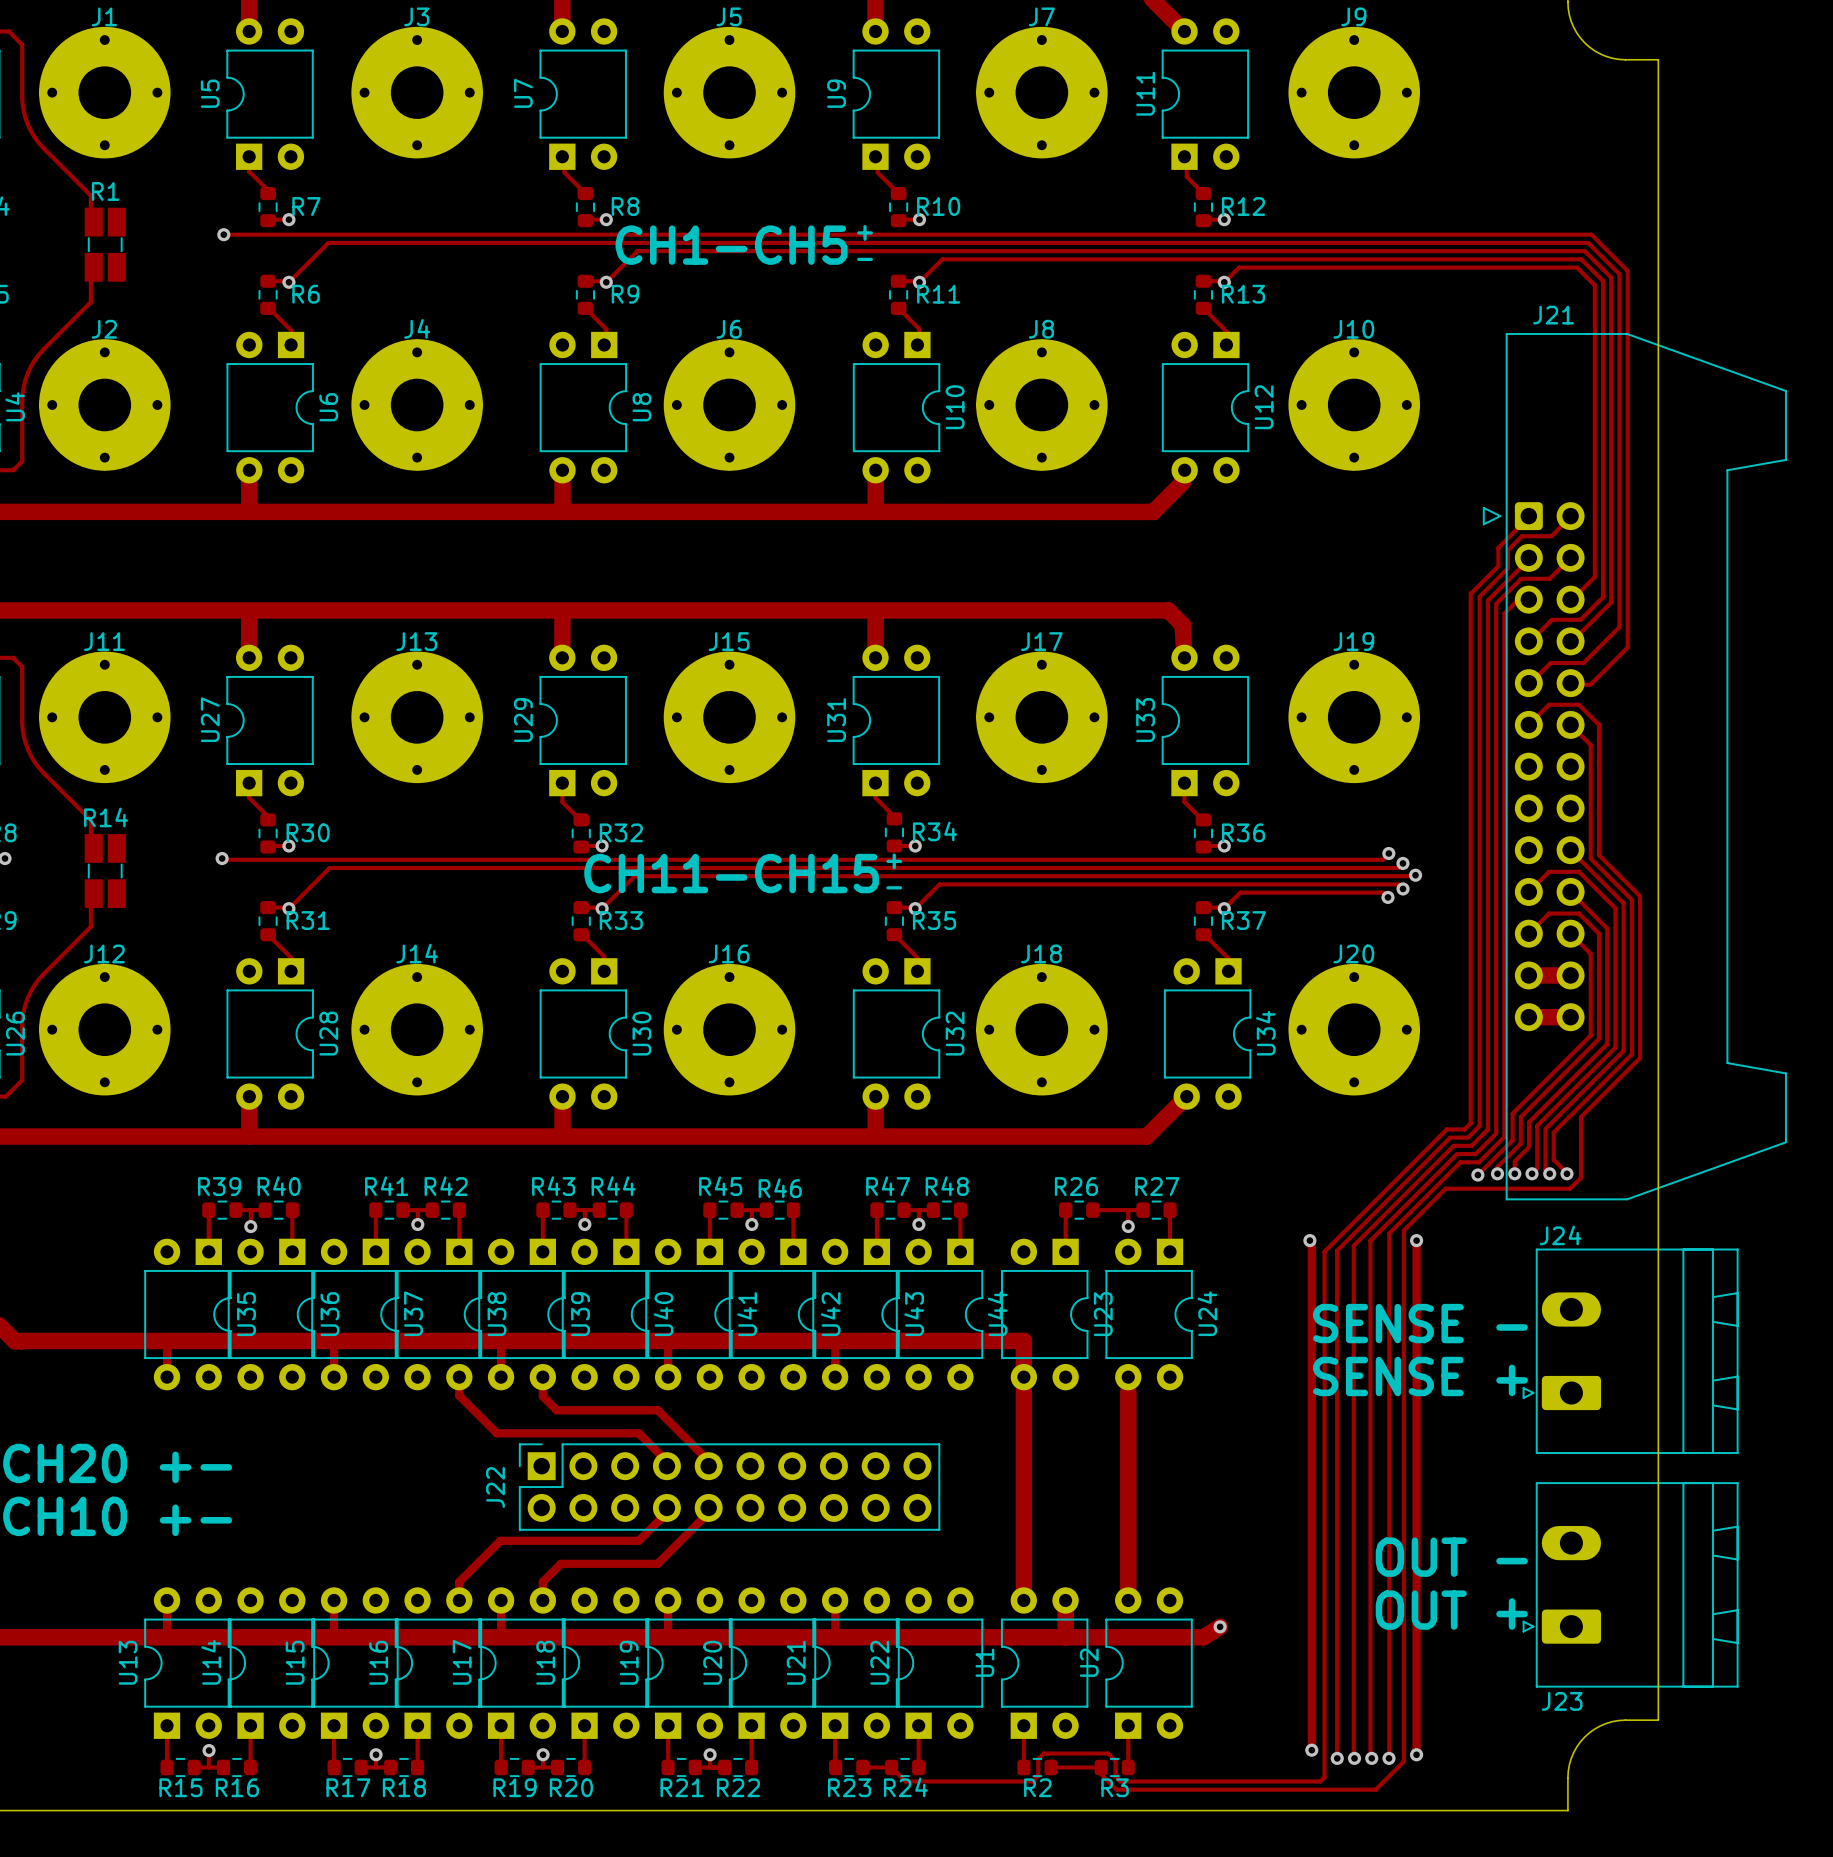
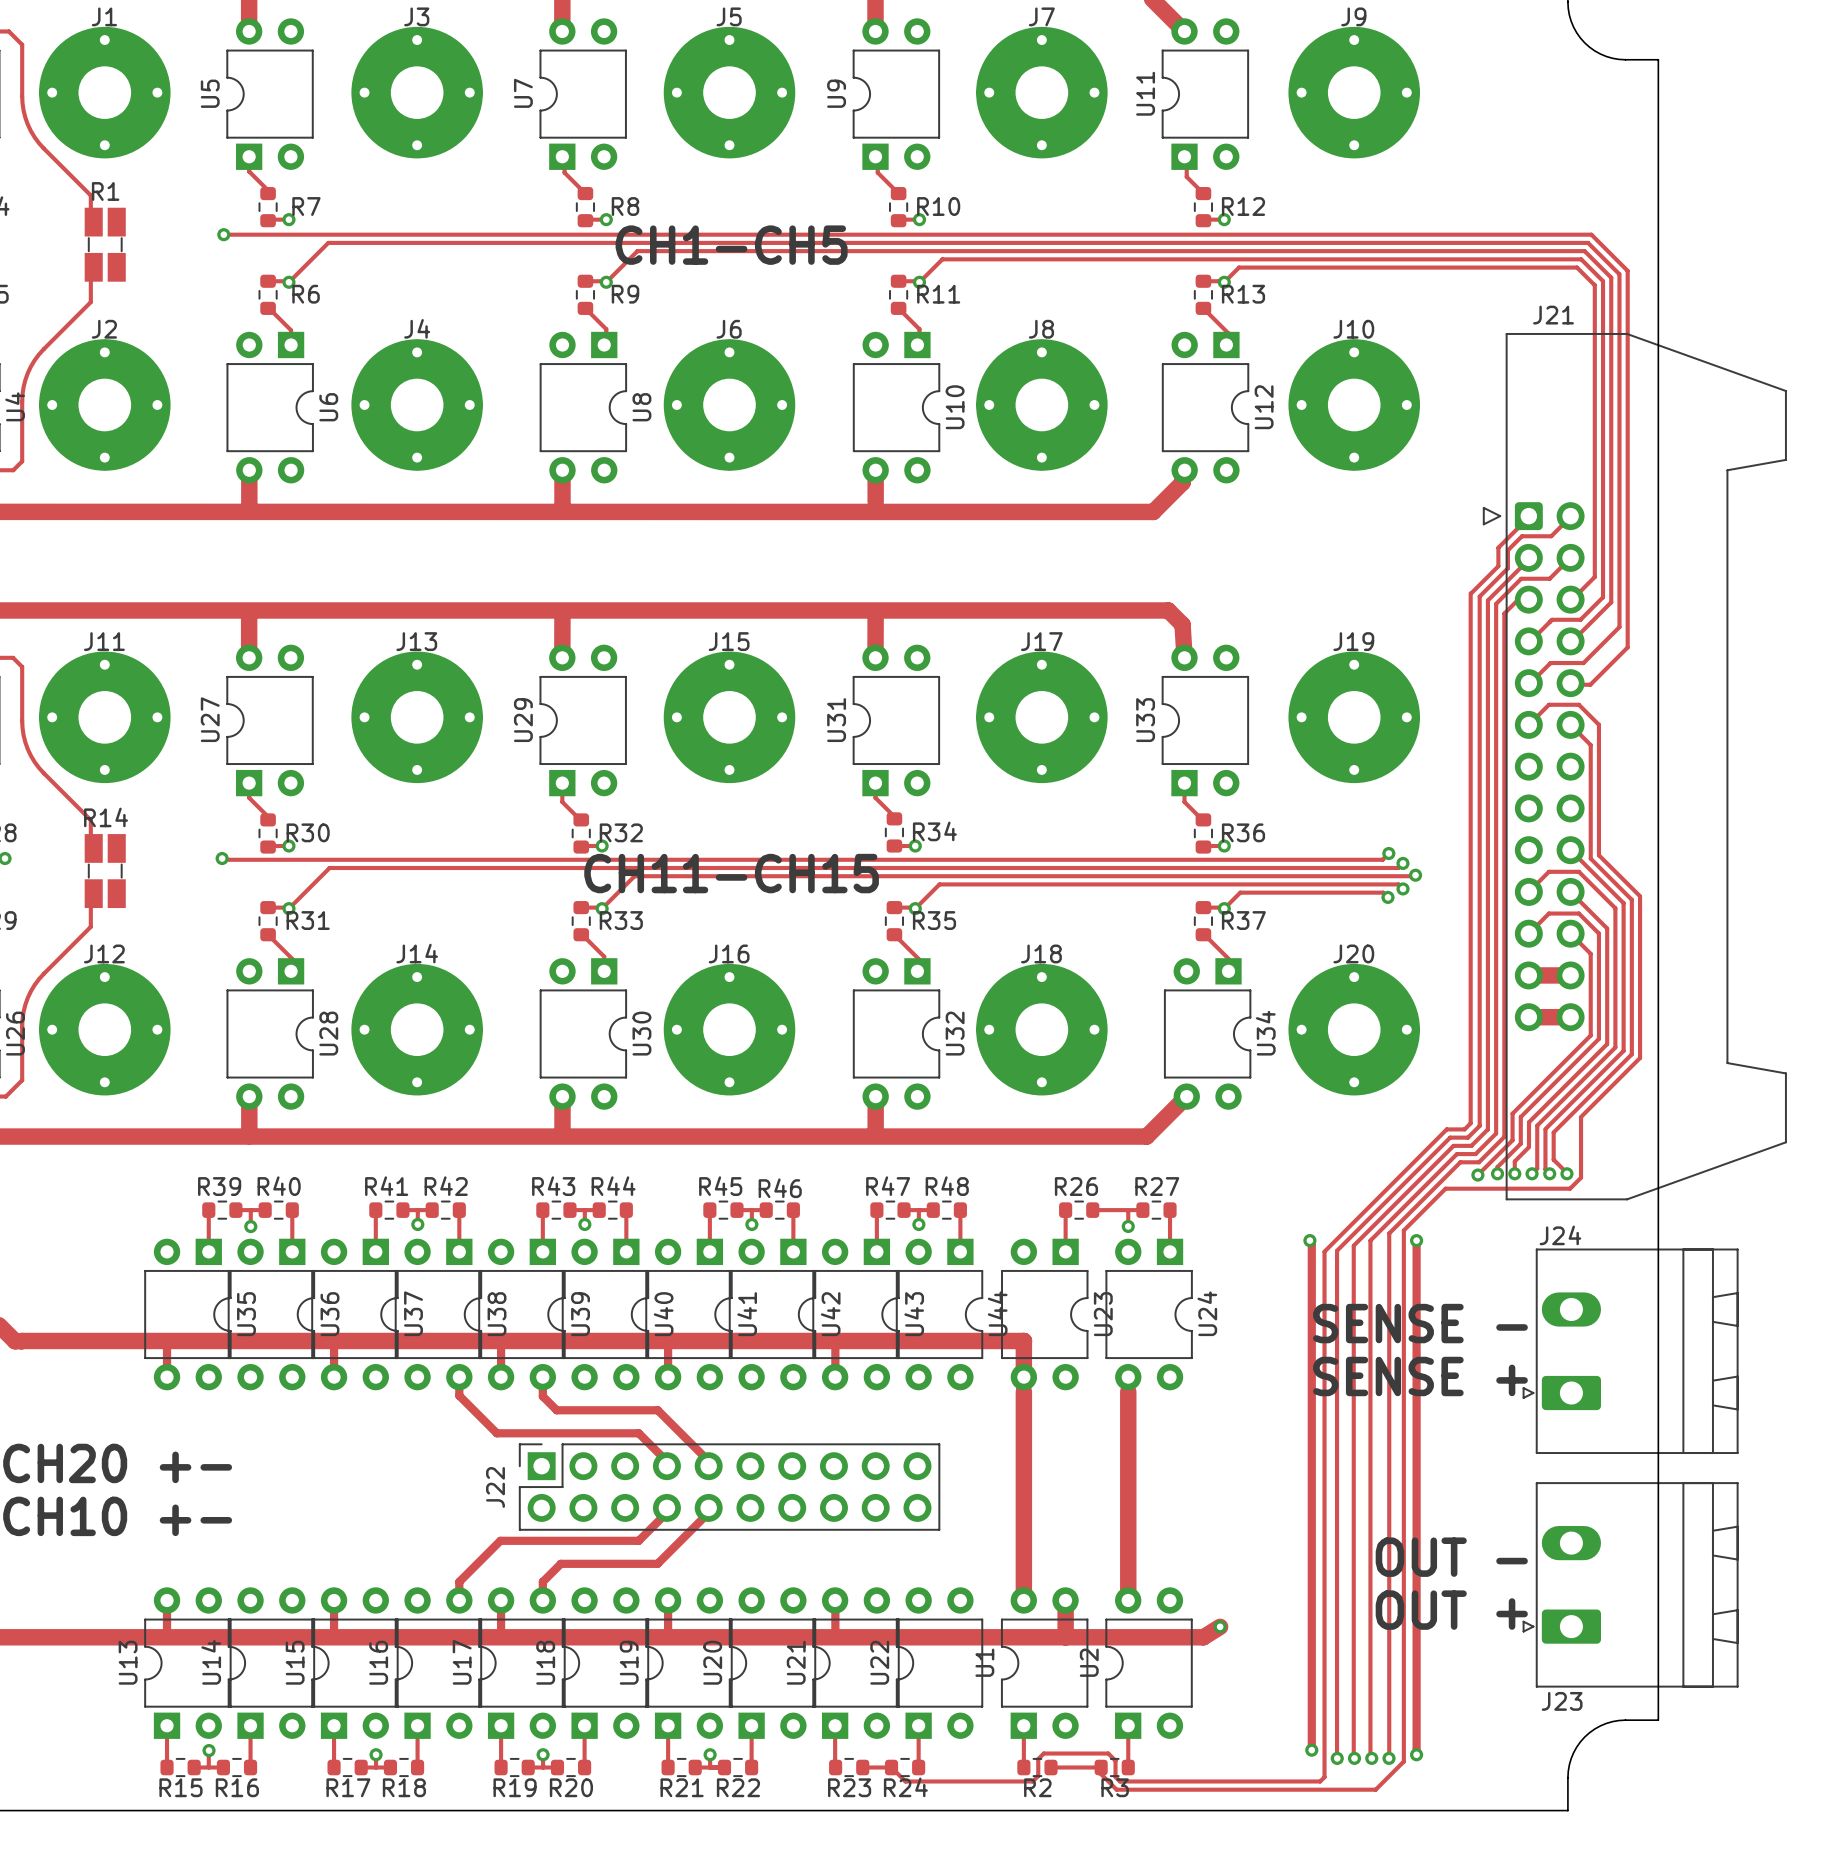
text: + (865, 232) -> none
text: - (865, 259) -> none
text: + (894, 861) -> none
text: - (894, 887) -> none

